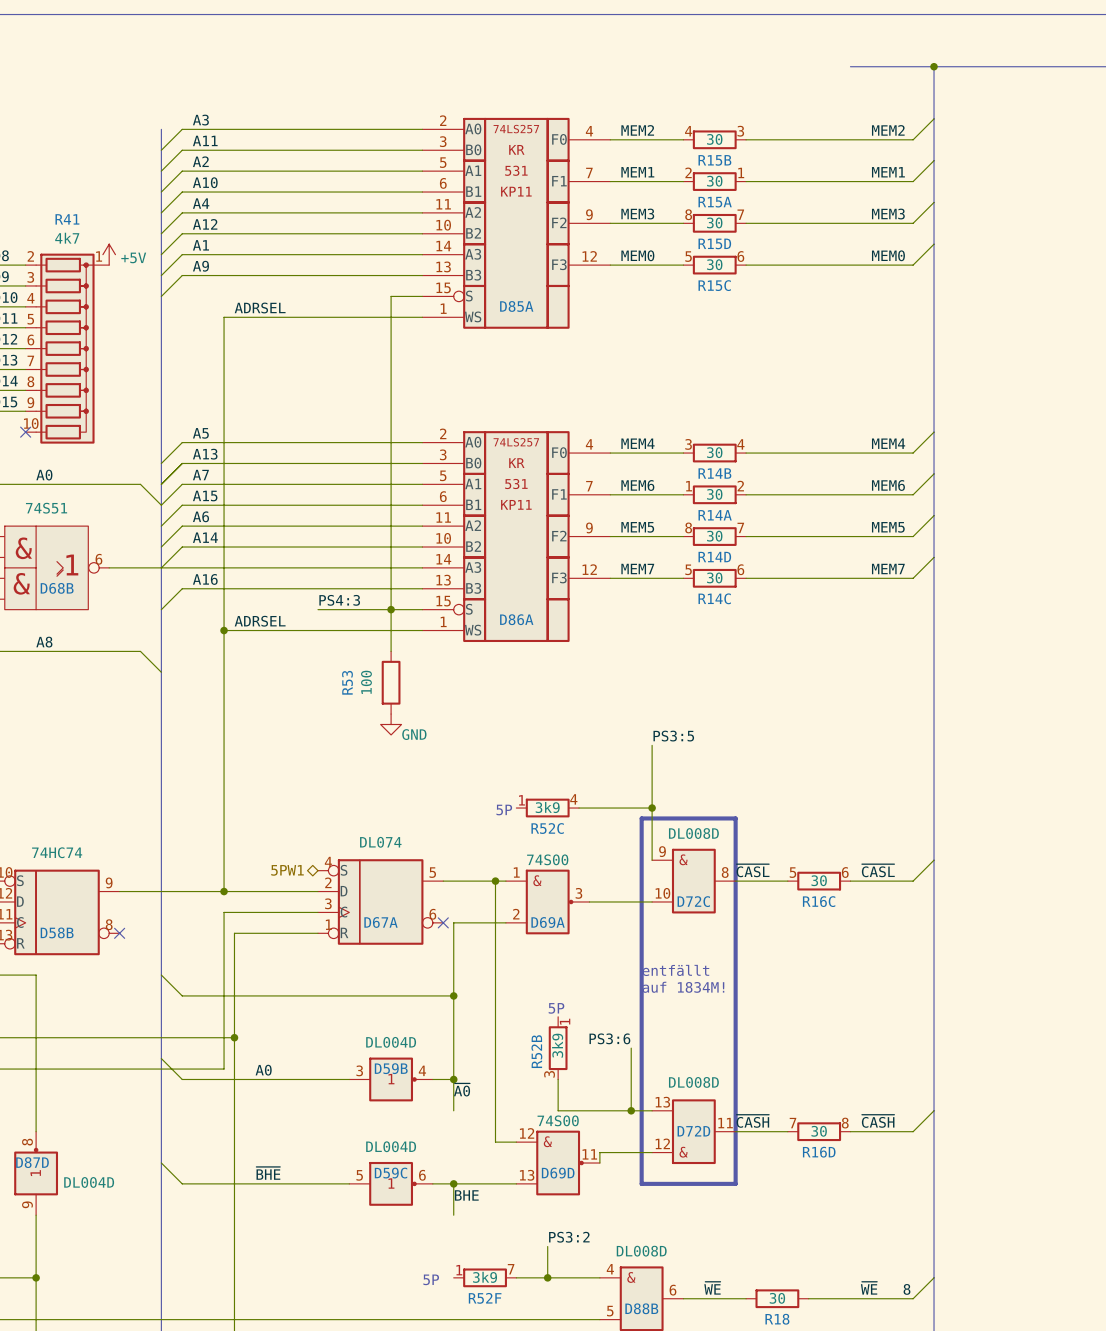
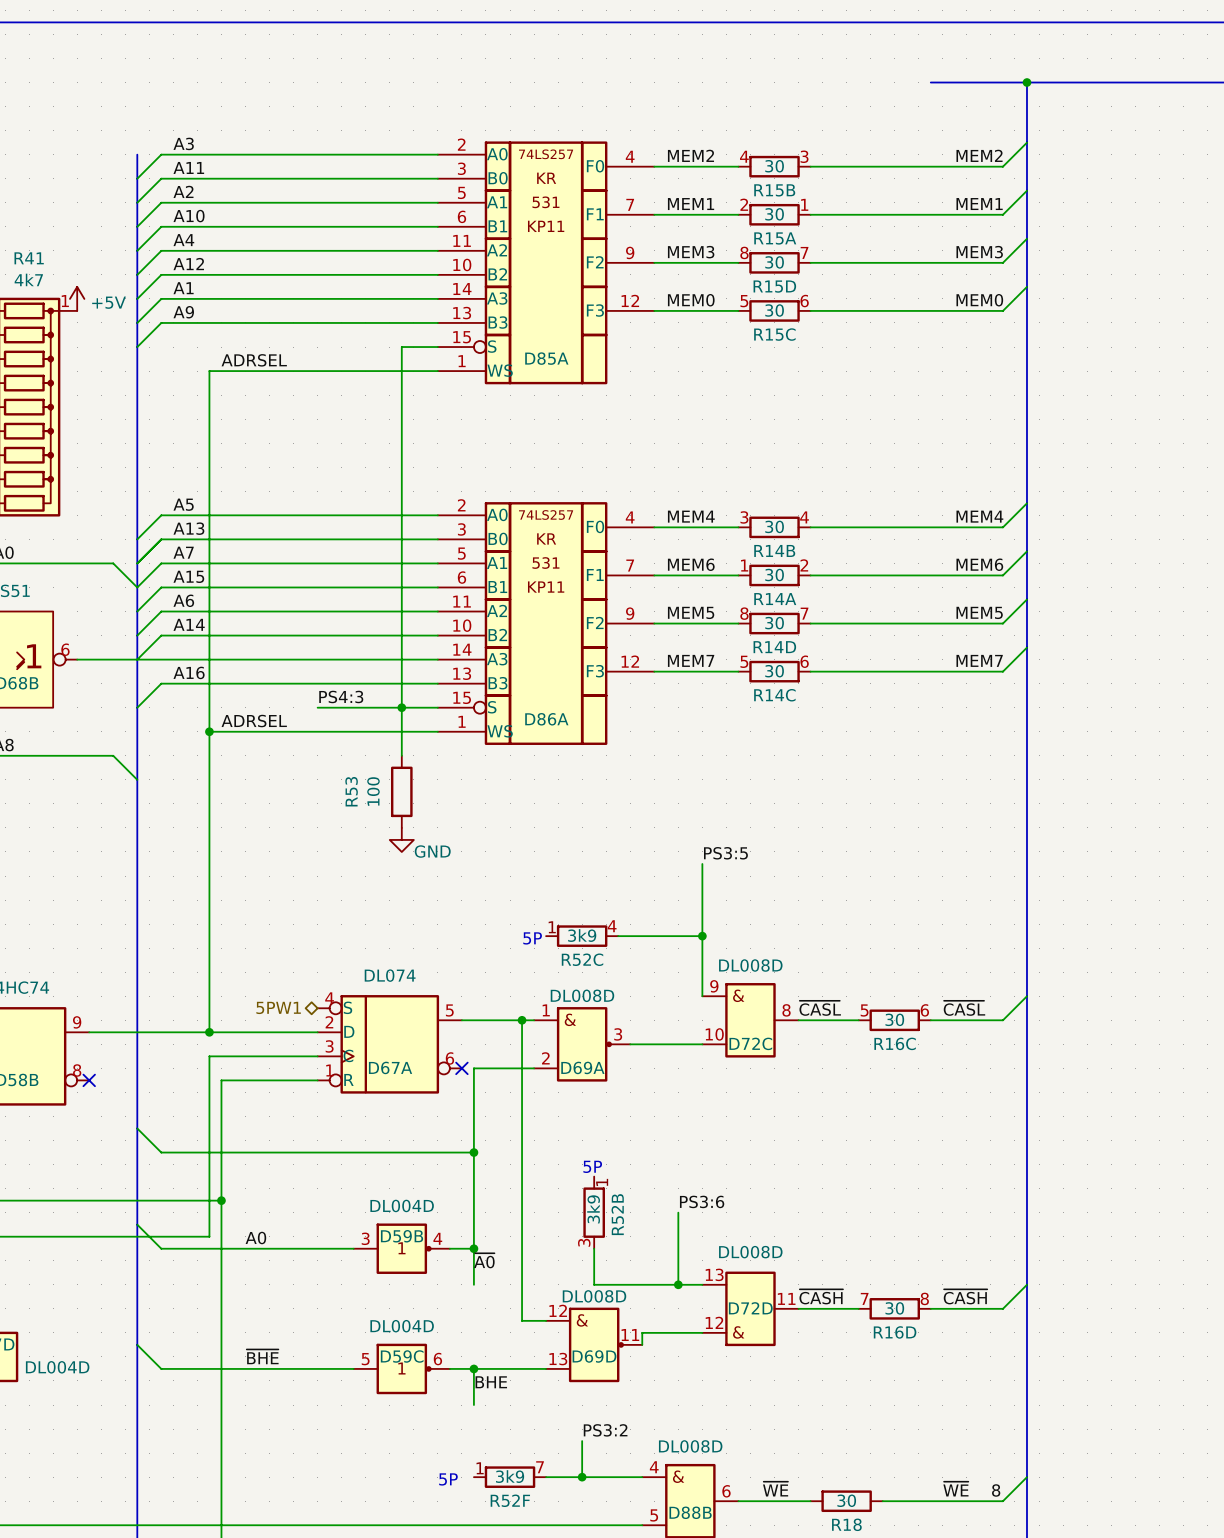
line: (641, 818) (641, 1183) (735, 1183) (735, 818) (641, 818) -> none
D69A value: 74S00 (547, 859) -> DL008D (582, 995)
text: entfällt (675, 970) -> none
text: auf 1834M! (683, 987) -> none
label position: PS3:6 (609, 1038) -> PS3:6 (702, 1201)
R52B name position: R52B (536, 1051) -> R52B (617, 1214)
D69D value: 74S00 (558, 1120) -> DL008D (594, 1296)

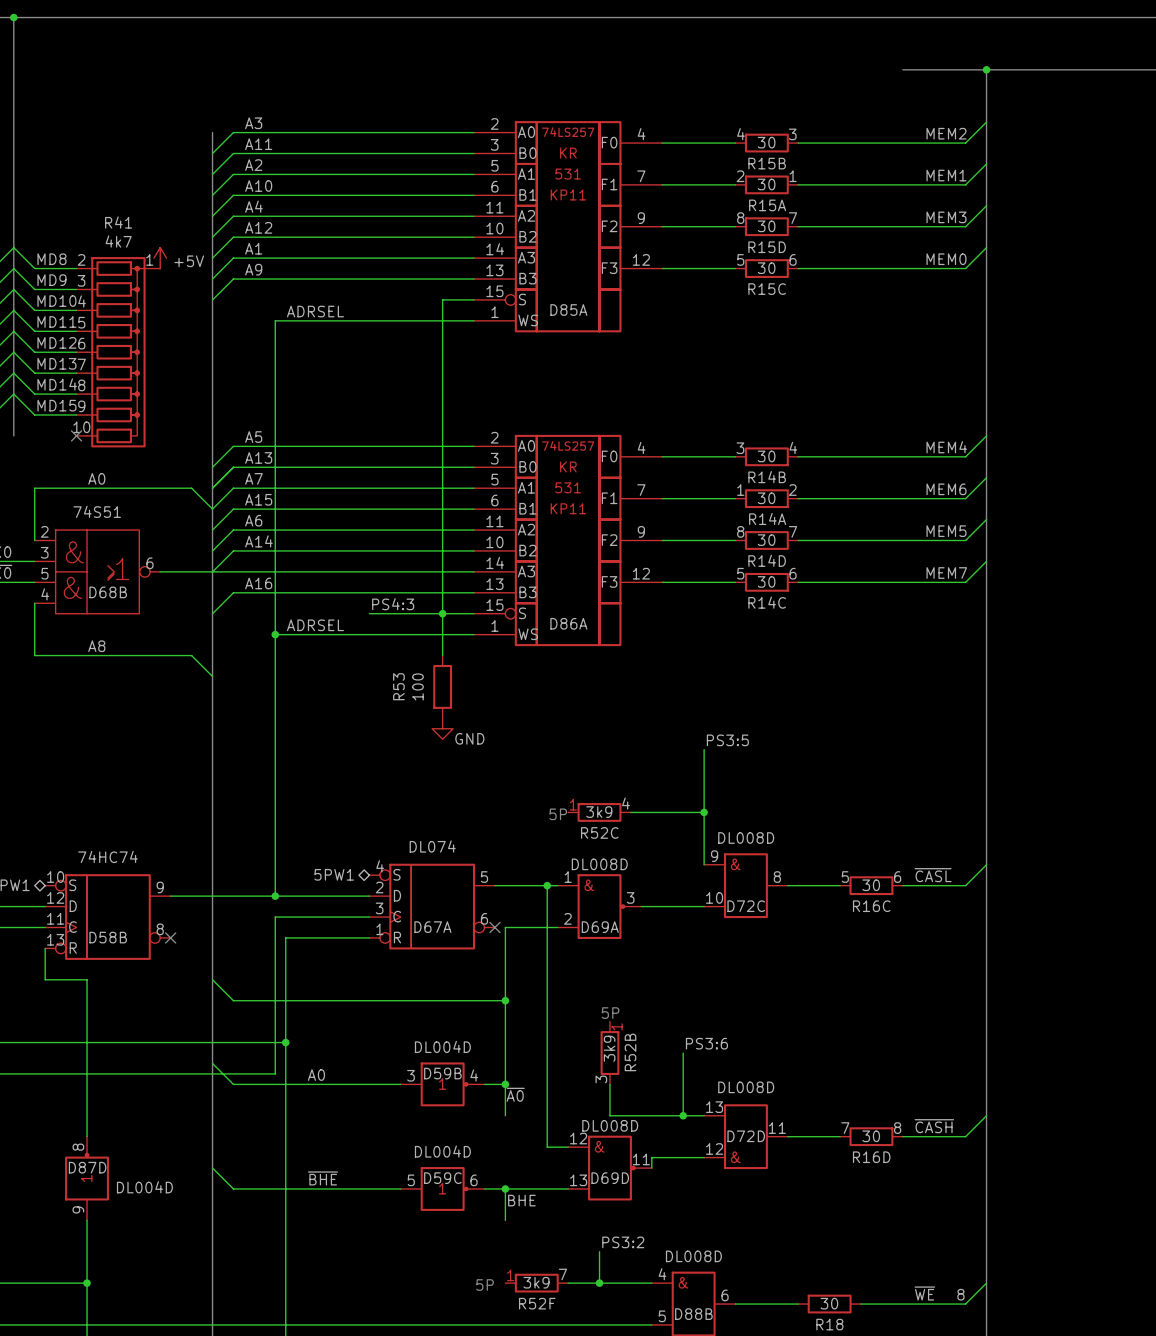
label: MEM2 (690, 155) -> none
label: MEM1 (691, 204) -> none
label: MEM3 (691, 252) -> none
label: MEM0 (691, 300) -> none
label: MEM4 (691, 516) -> none
label: MEM6 (691, 564) -> none
label: MEM5 (691, 612) -> none
label: MEM7 (691, 660) -> none
label: ~{CASL} (820, 1008) -> none
label: ~{CASH} (821, 1296) -> none
label: ~{WE} (775, 1489) -> none

